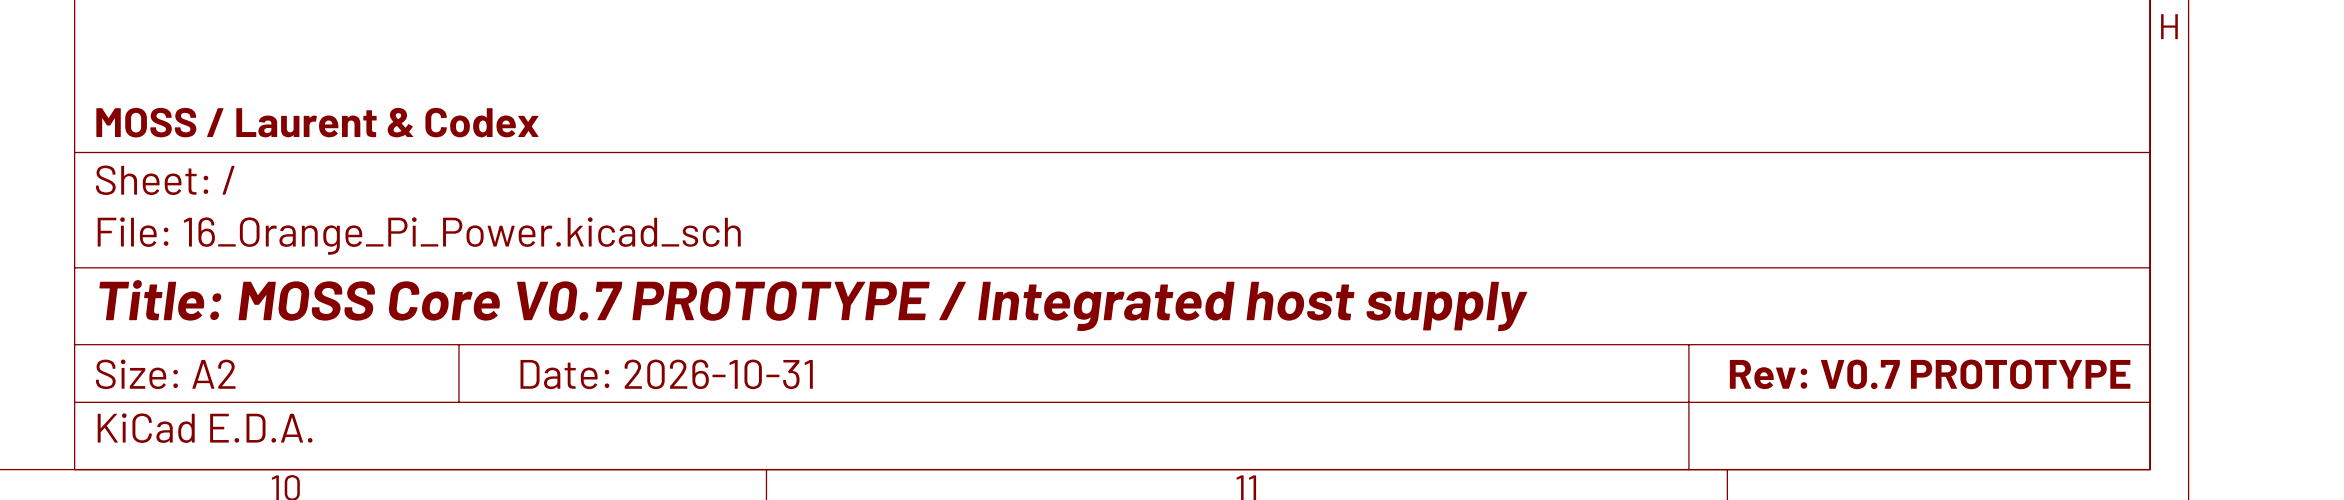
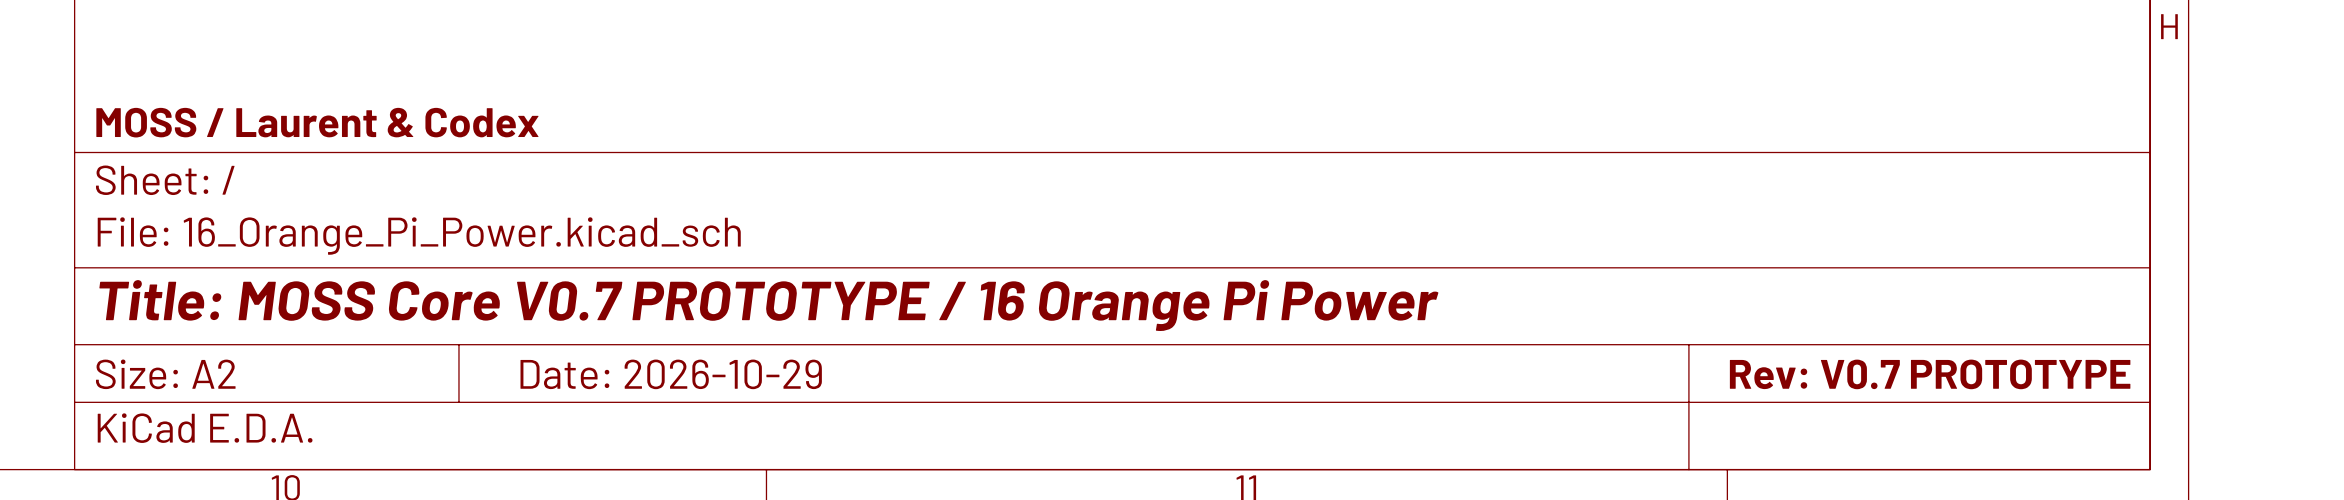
title block: Title: MOSS Core V0.7 PROTOTYPE / Integrated host supply (813, 305) -> Title: MOSS Core V0.7 PROTOTYPE / 16 Orange Pi Power (768, 305)
title block: Date: 2026-10-31 (666, 374) -> Date: 2026-10-29 (671, 374)

